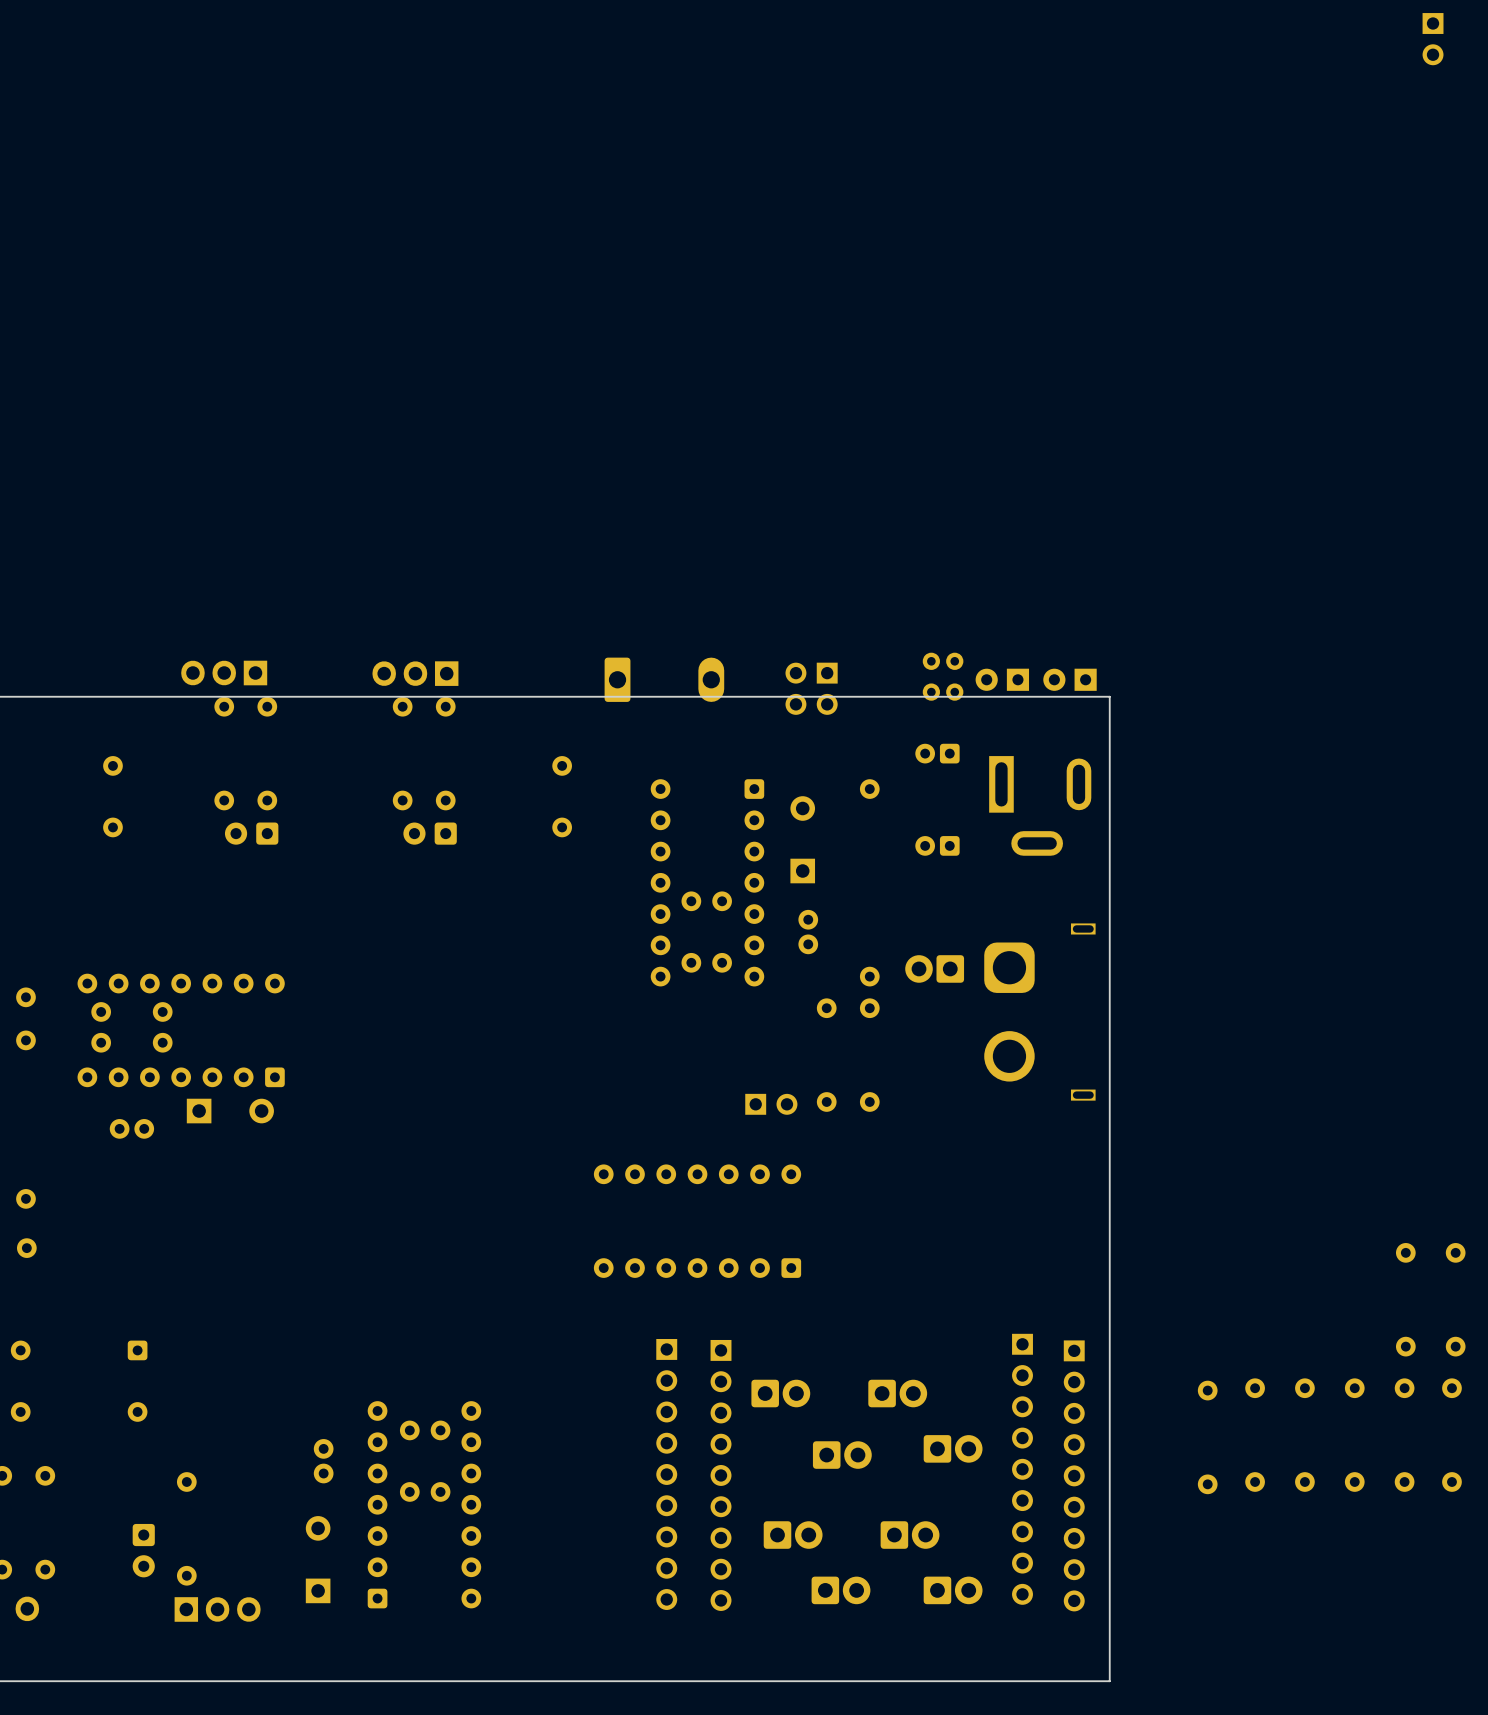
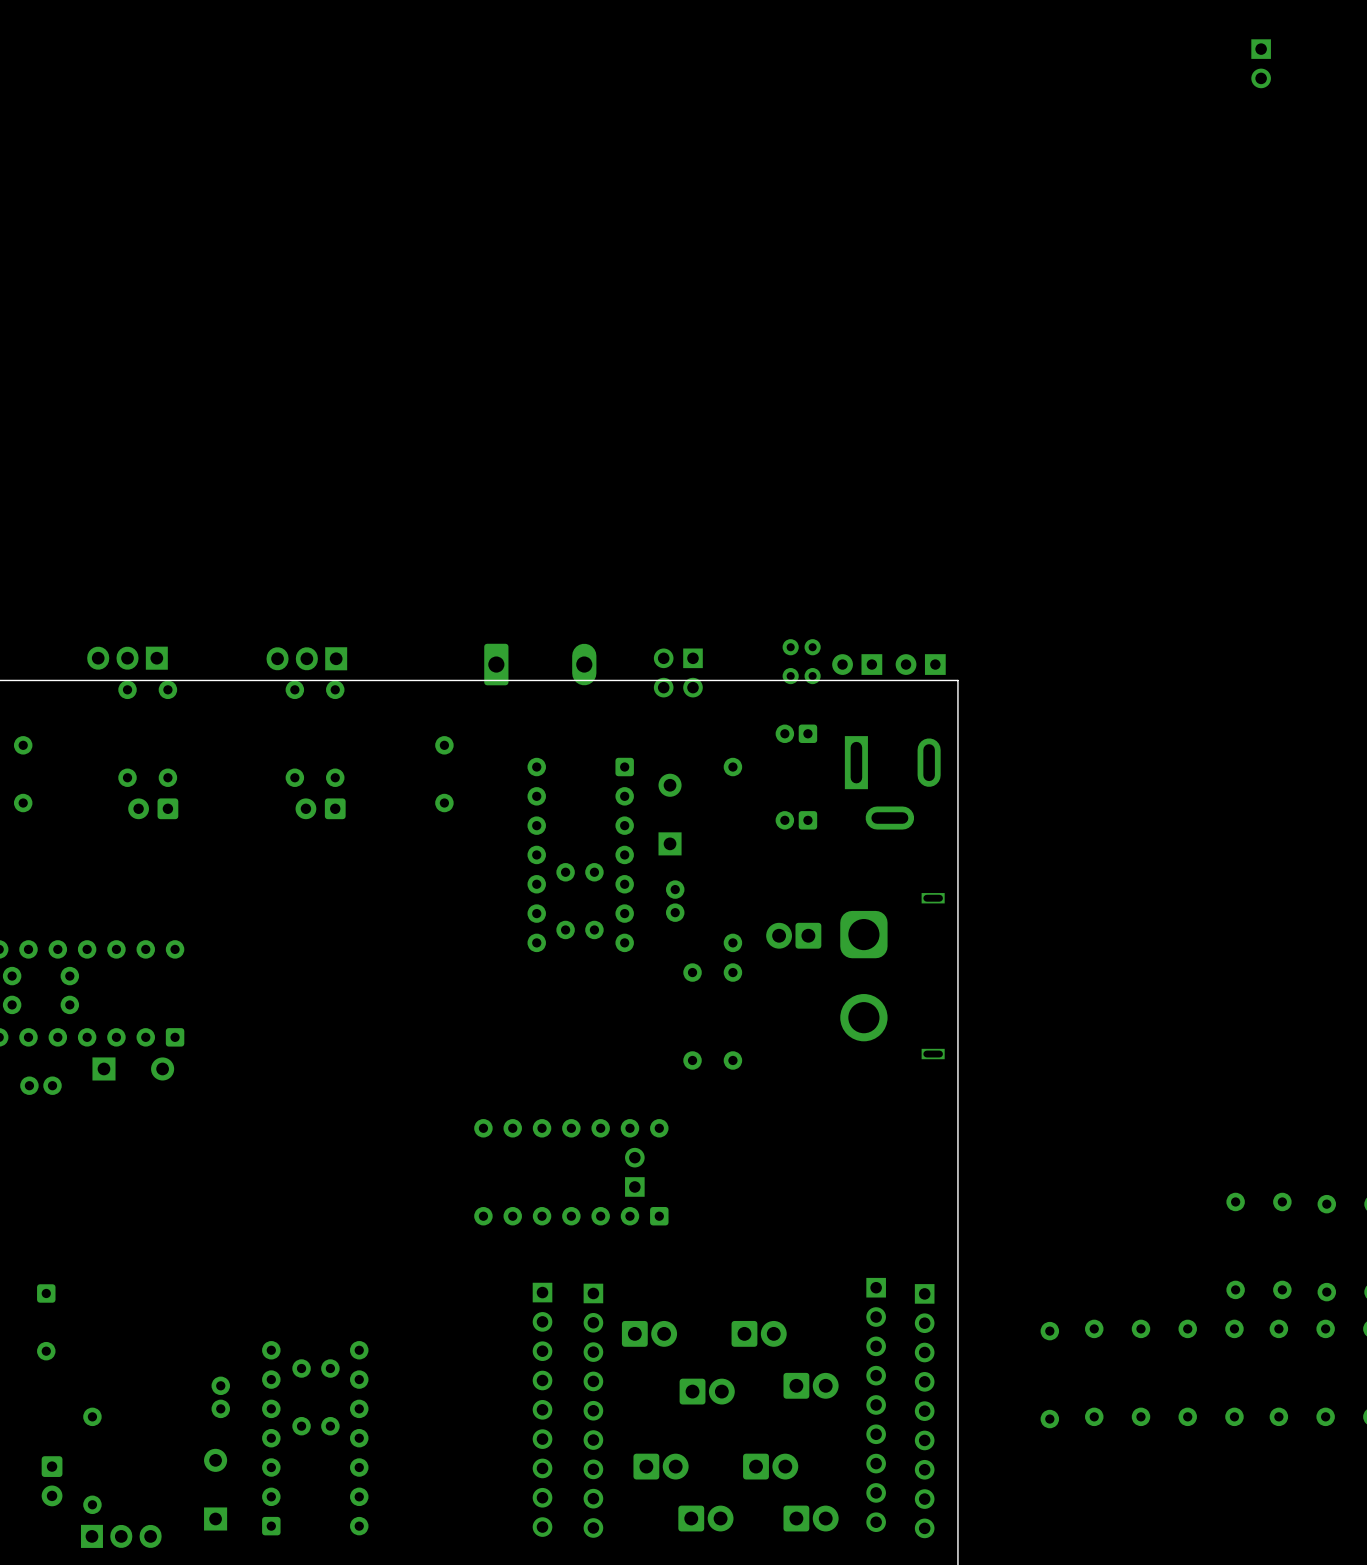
part rotation: 0° (771, 1104) -> 90° counterclockwise (634, 1172)
part position: (771, 1104) -> (634, 1172)

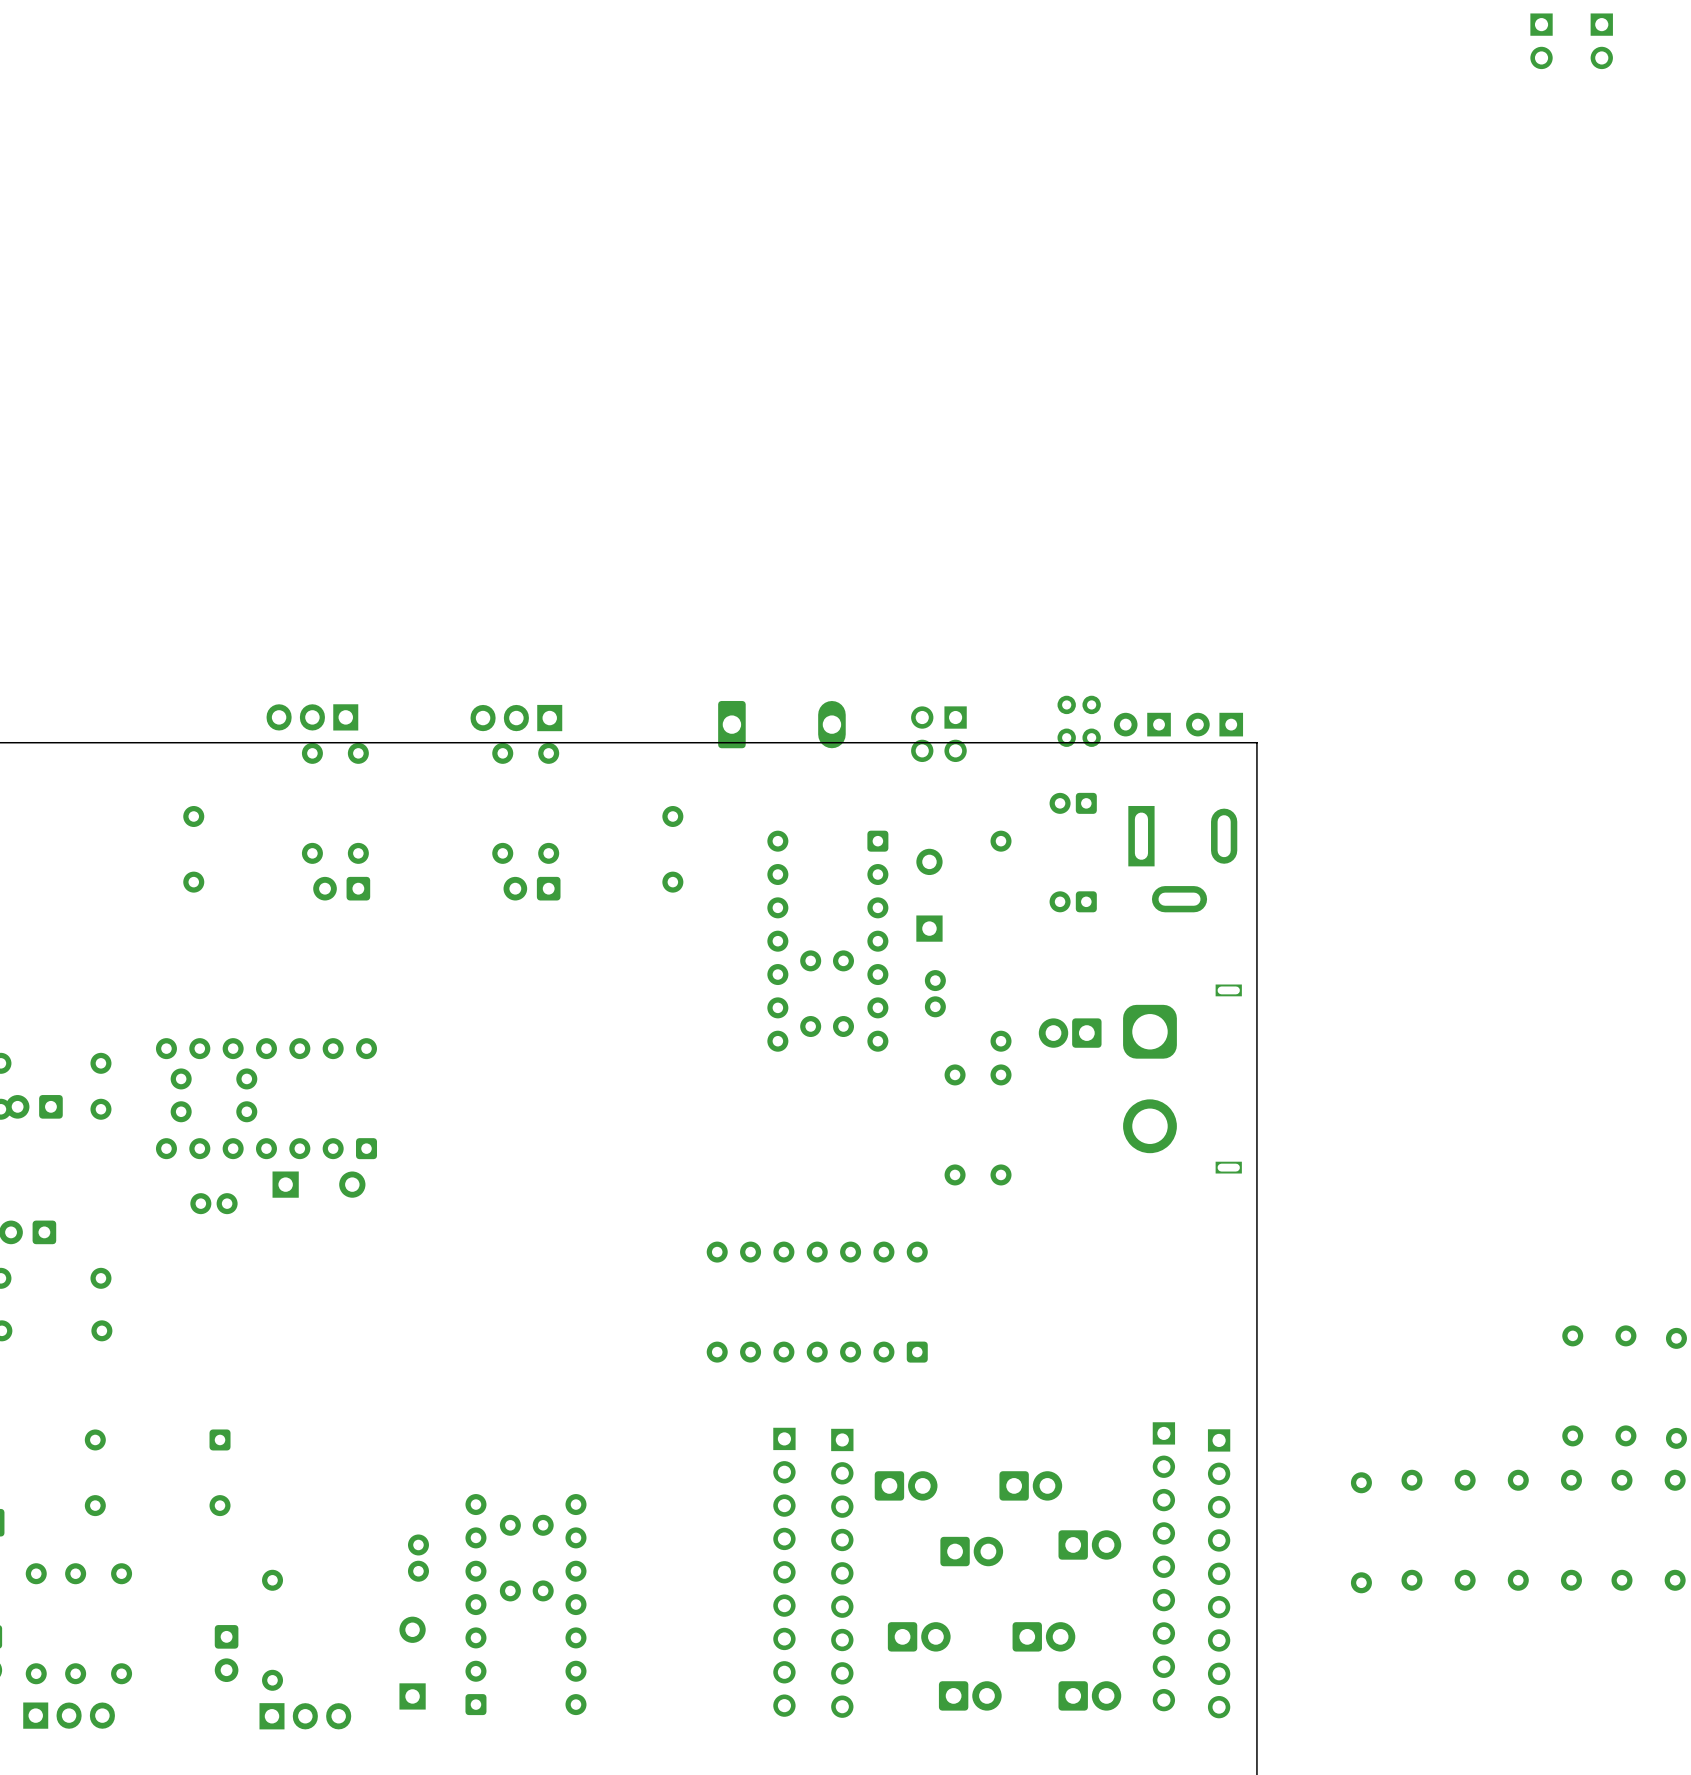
part: none -> (1541, 41)
part: (634, 1172) -> none

